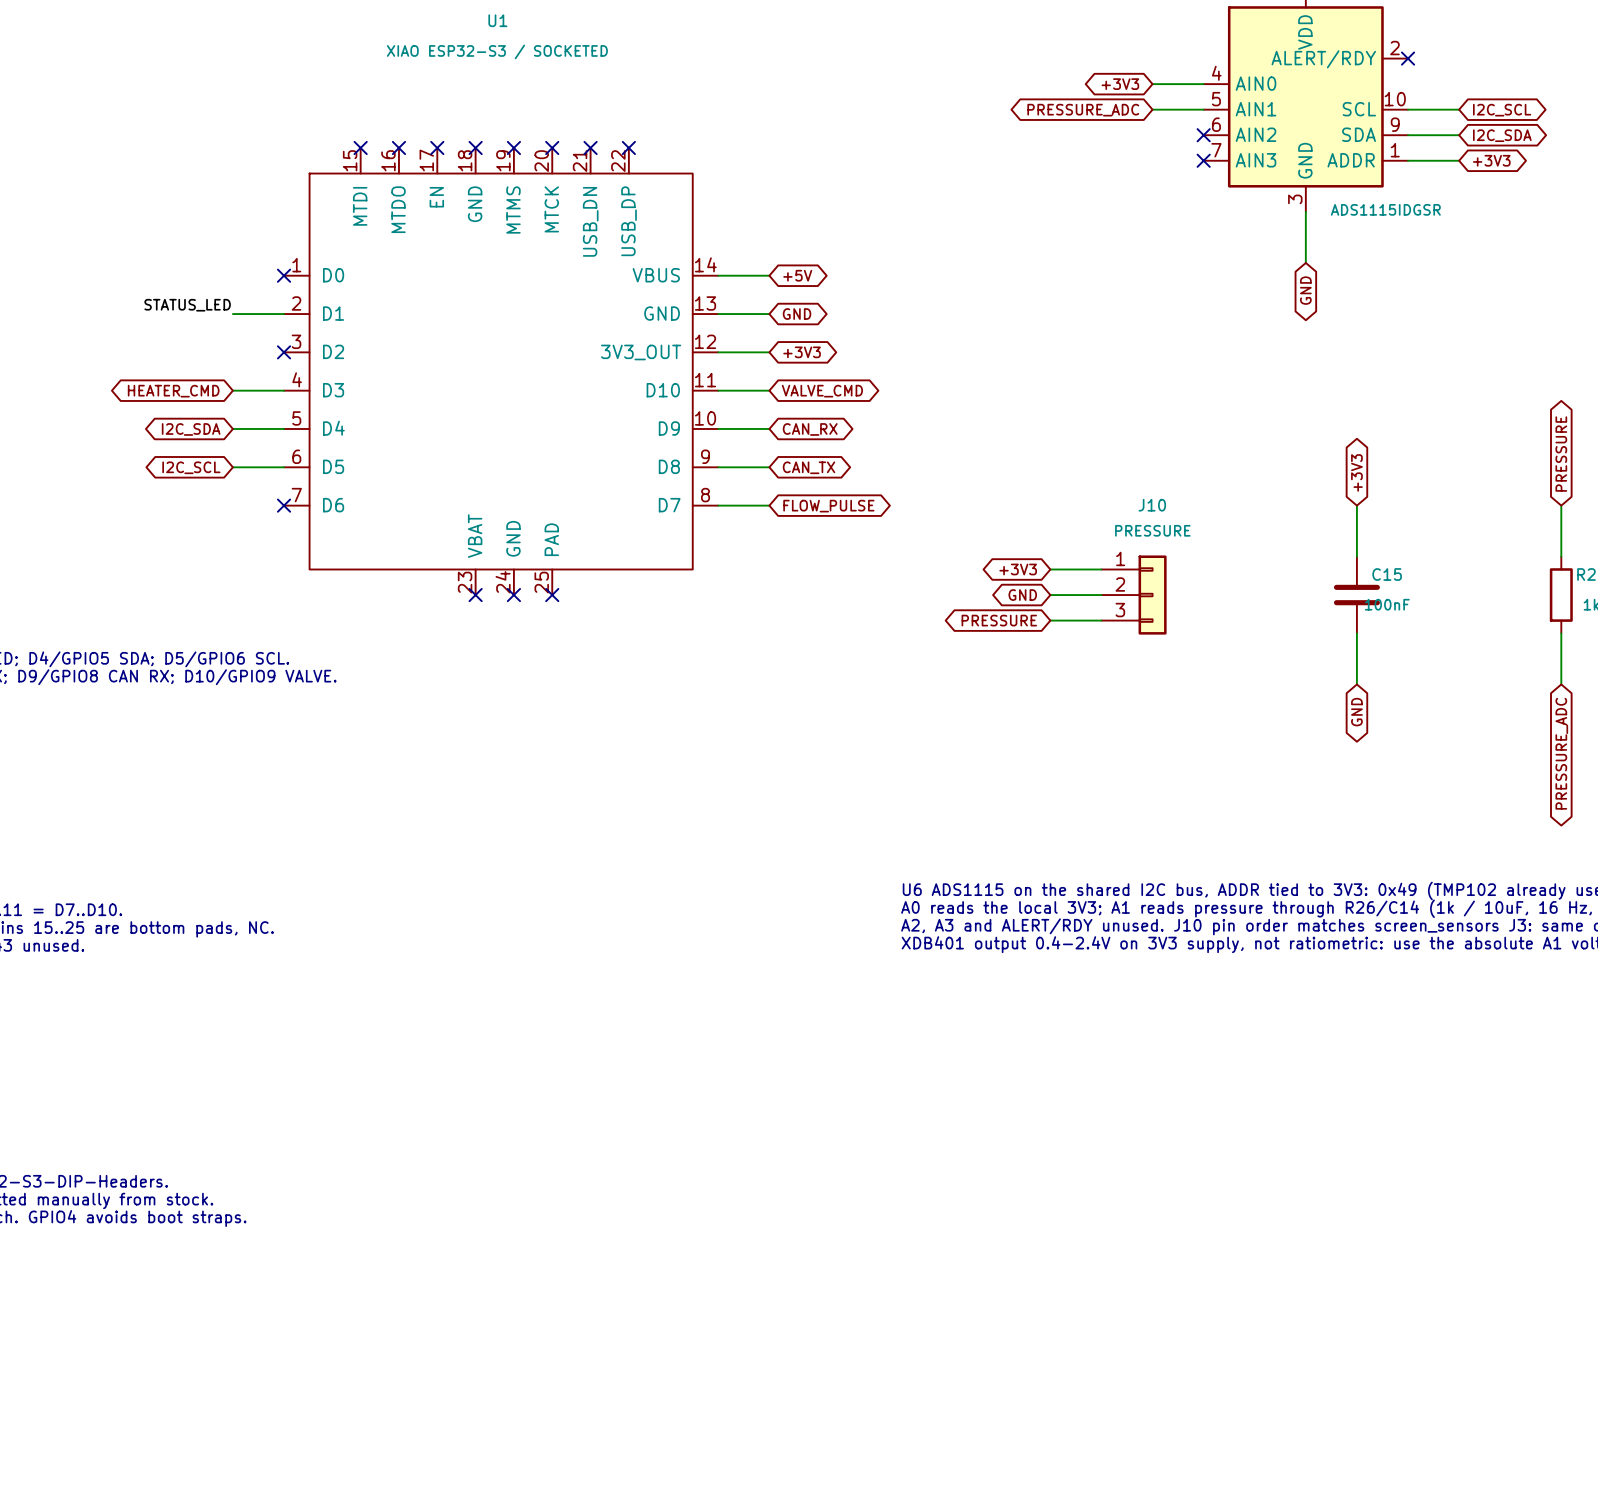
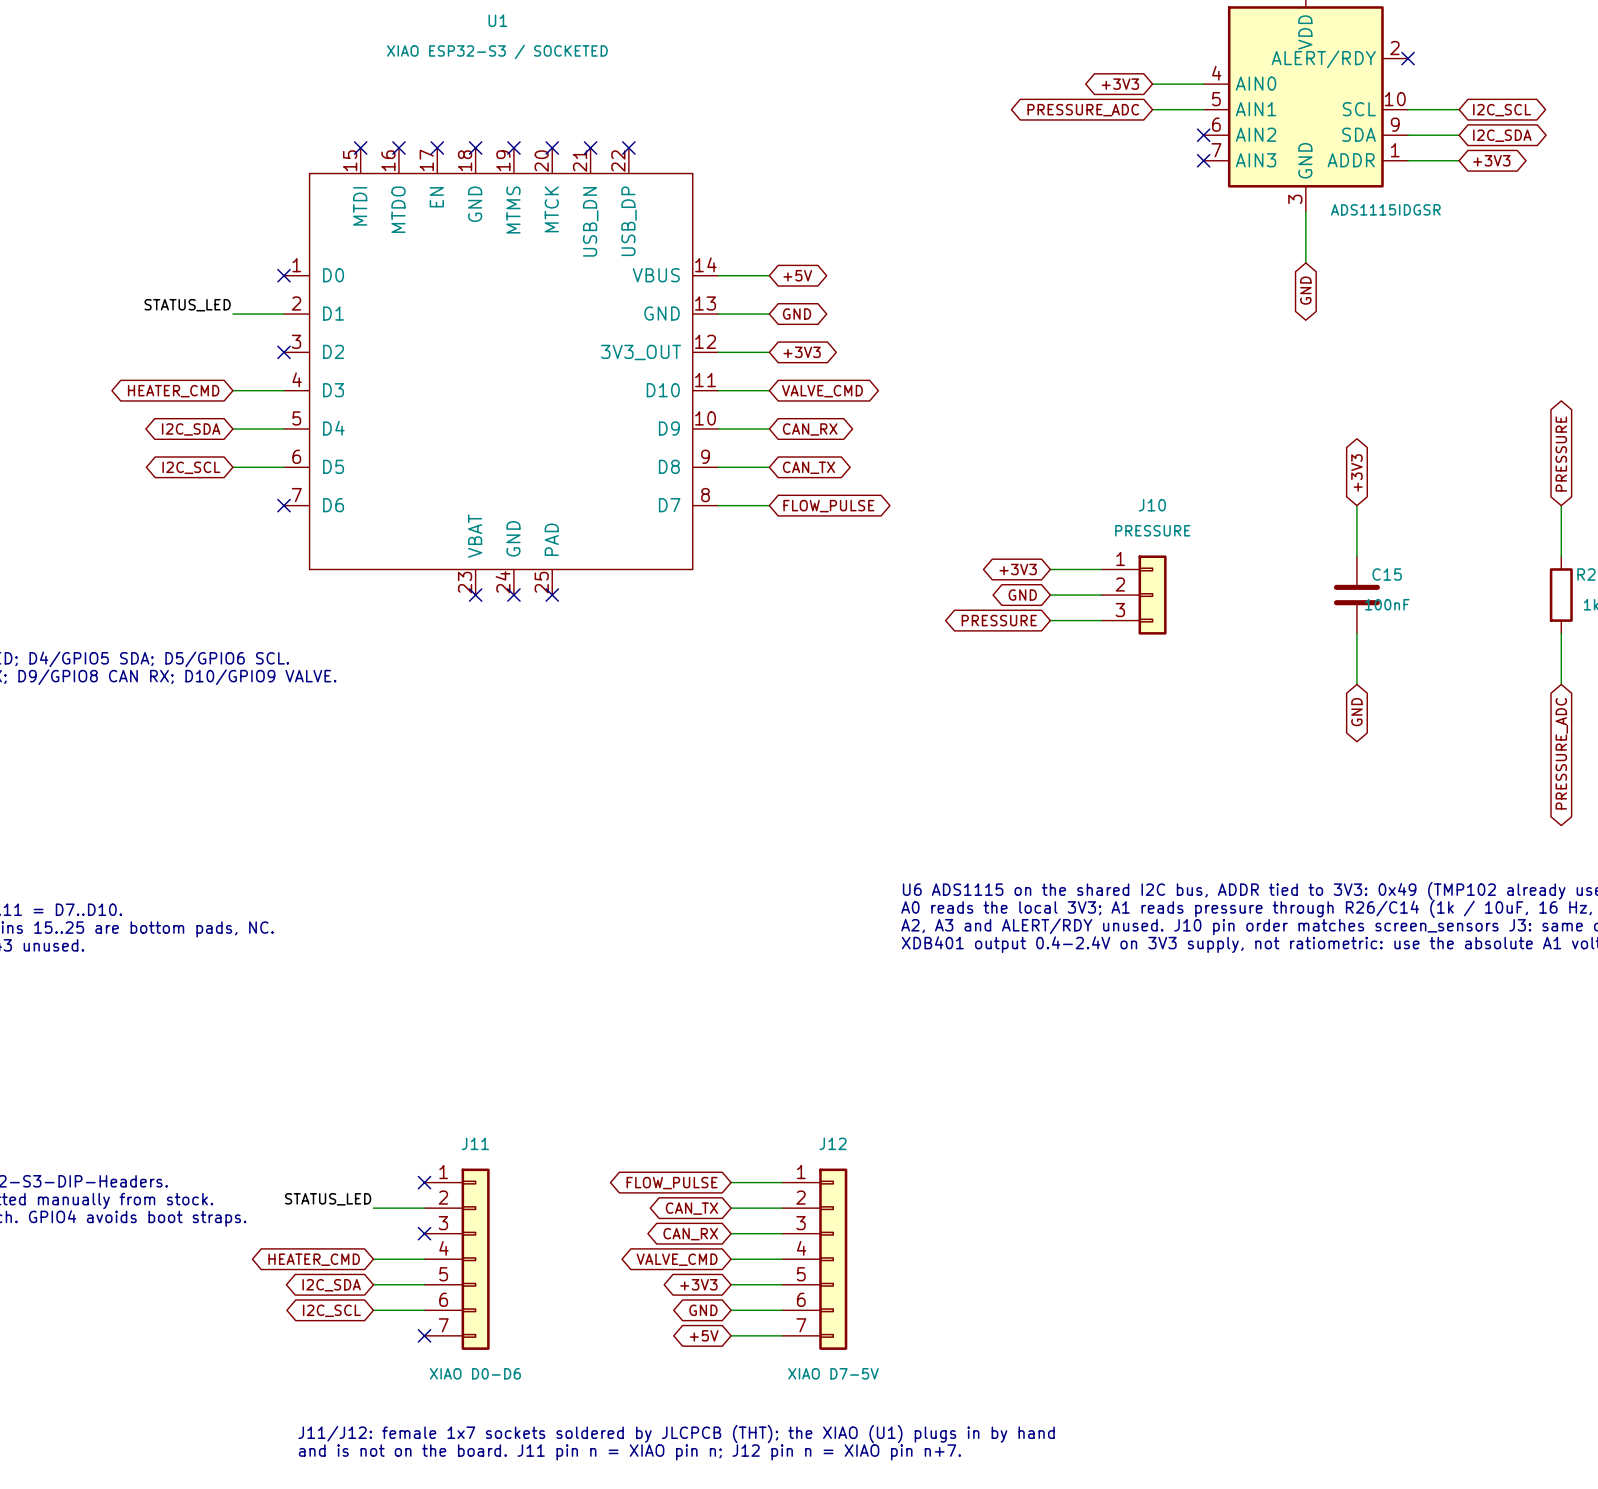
no-connect mark: none -> (424, 1182)
wire: none -> (731, 1182) (782, 1182)
global label: none -> FLOW_PULSE (672, 1183)
label: none -> STATUS_LED (328, 1199)
wire: none -> (373, 1208) (424, 1208)
global label: none -> CAN_TX (691, 1208)
wire: none -> (731, 1208) (782, 1208)
no-connect mark: none -> (424, 1233)
wire: none -> (731, 1233) (782, 1233)
global label: none -> CAN_RX (690, 1234)
global label: none -> HEATER_CMD (314, 1259)
wire: none -> (373, 1259) (424, 1259)
J11: none -> XIAO D0-D6 (457, 1259)
global label: none -> VALVE_CMD (677, 1259)
wire: none -> (731, 1259) (782, 1259)
J12: none -> XIAO D7-5V (814, 1259)
wire: none -> (373, 1284) (424, 1284)
global label: none -> +3V3 (698, 1284)
wire: none -> (731, 1284) (782, 1284)
global label: none -> I2C_SDA (331, 1285)
global label: none -> I2C_SCL (331, 1310)
wire: none -> (373, 1310) (424, 1310)
global label: none -> GND (703, 1310)
wire: none -> (731, 1310) (782, 1310)
no-connect mark: none -> (424, 1335)
global label: none -> +5V (704, 1335)
wire: none -> (731, 1335) (782, 1335)
text: none -> J11/J12: female 1x7 sockets soldered by JLCPCB (THT); the XIAO (U1) plugs in by hand (676, 1434)
text: none -> and is not on the board. J11 pin n = XIAO pin n; J12 pin n = XIAO pin n+7. (629, 1452)

